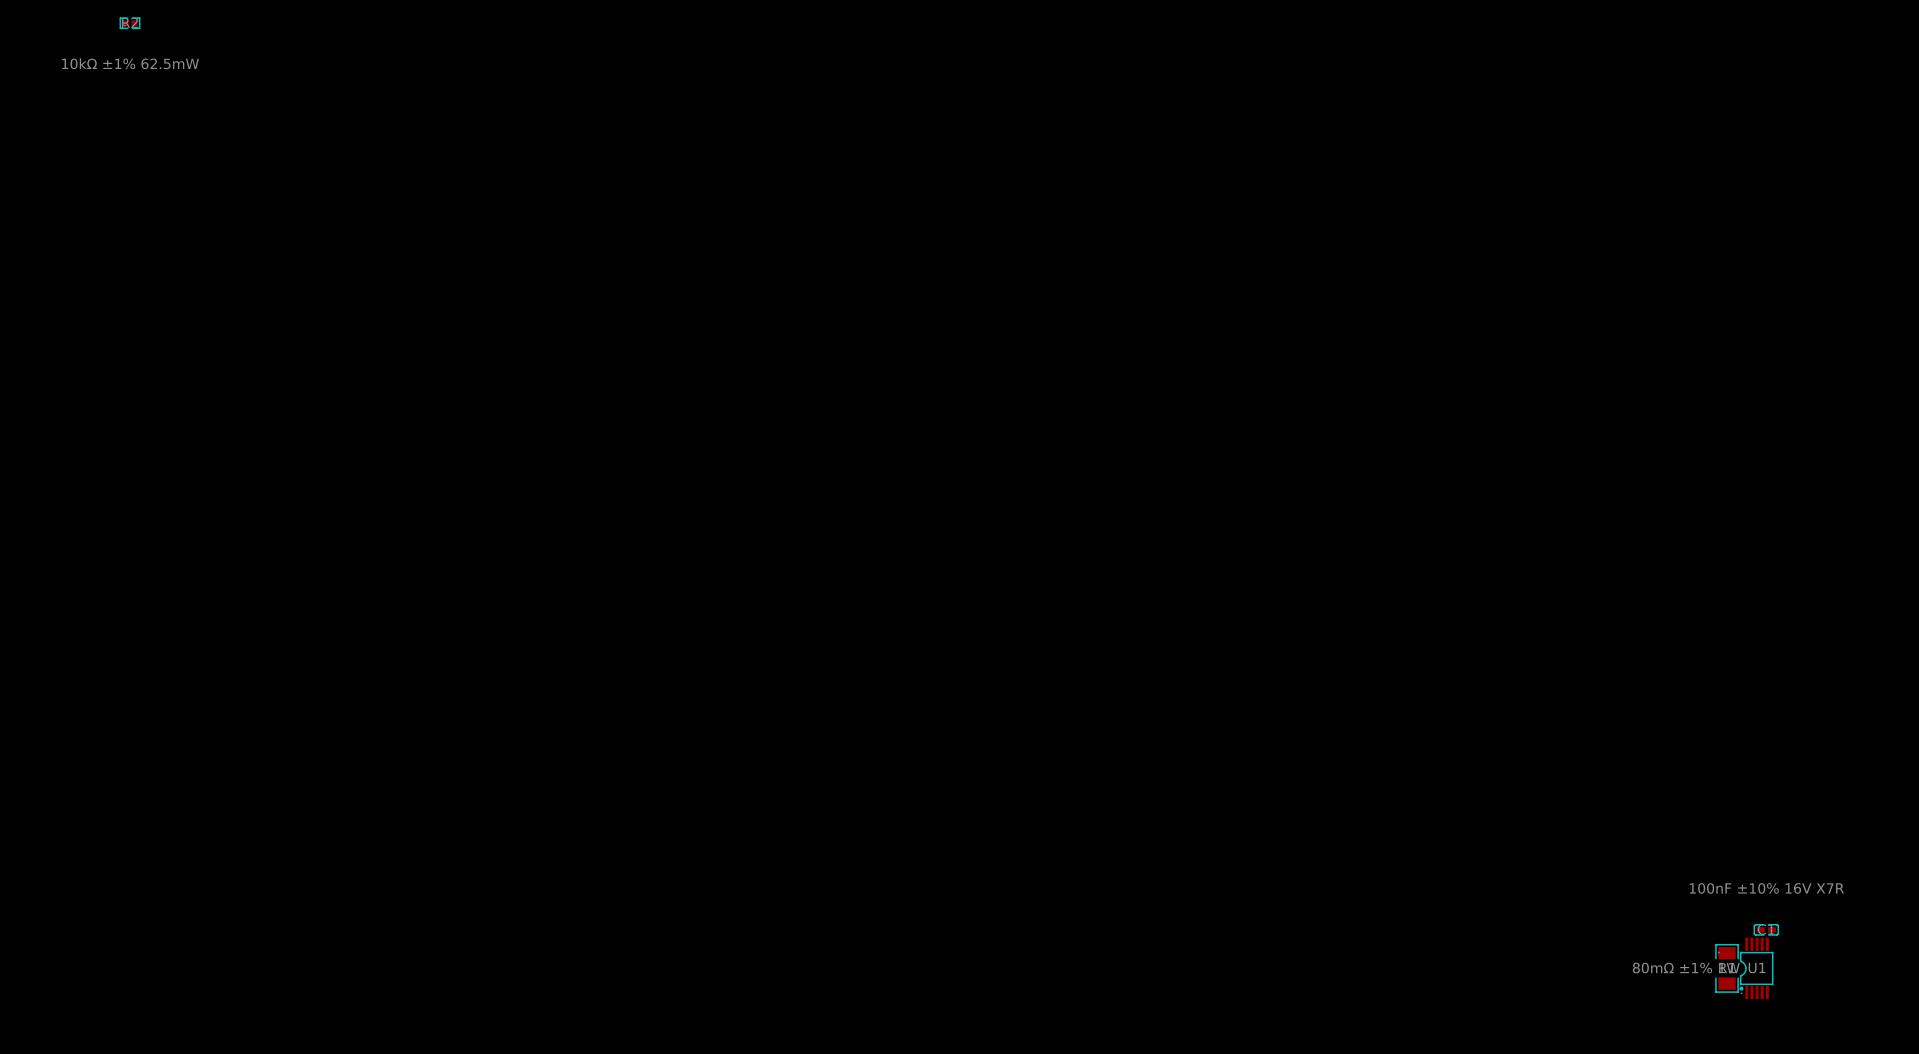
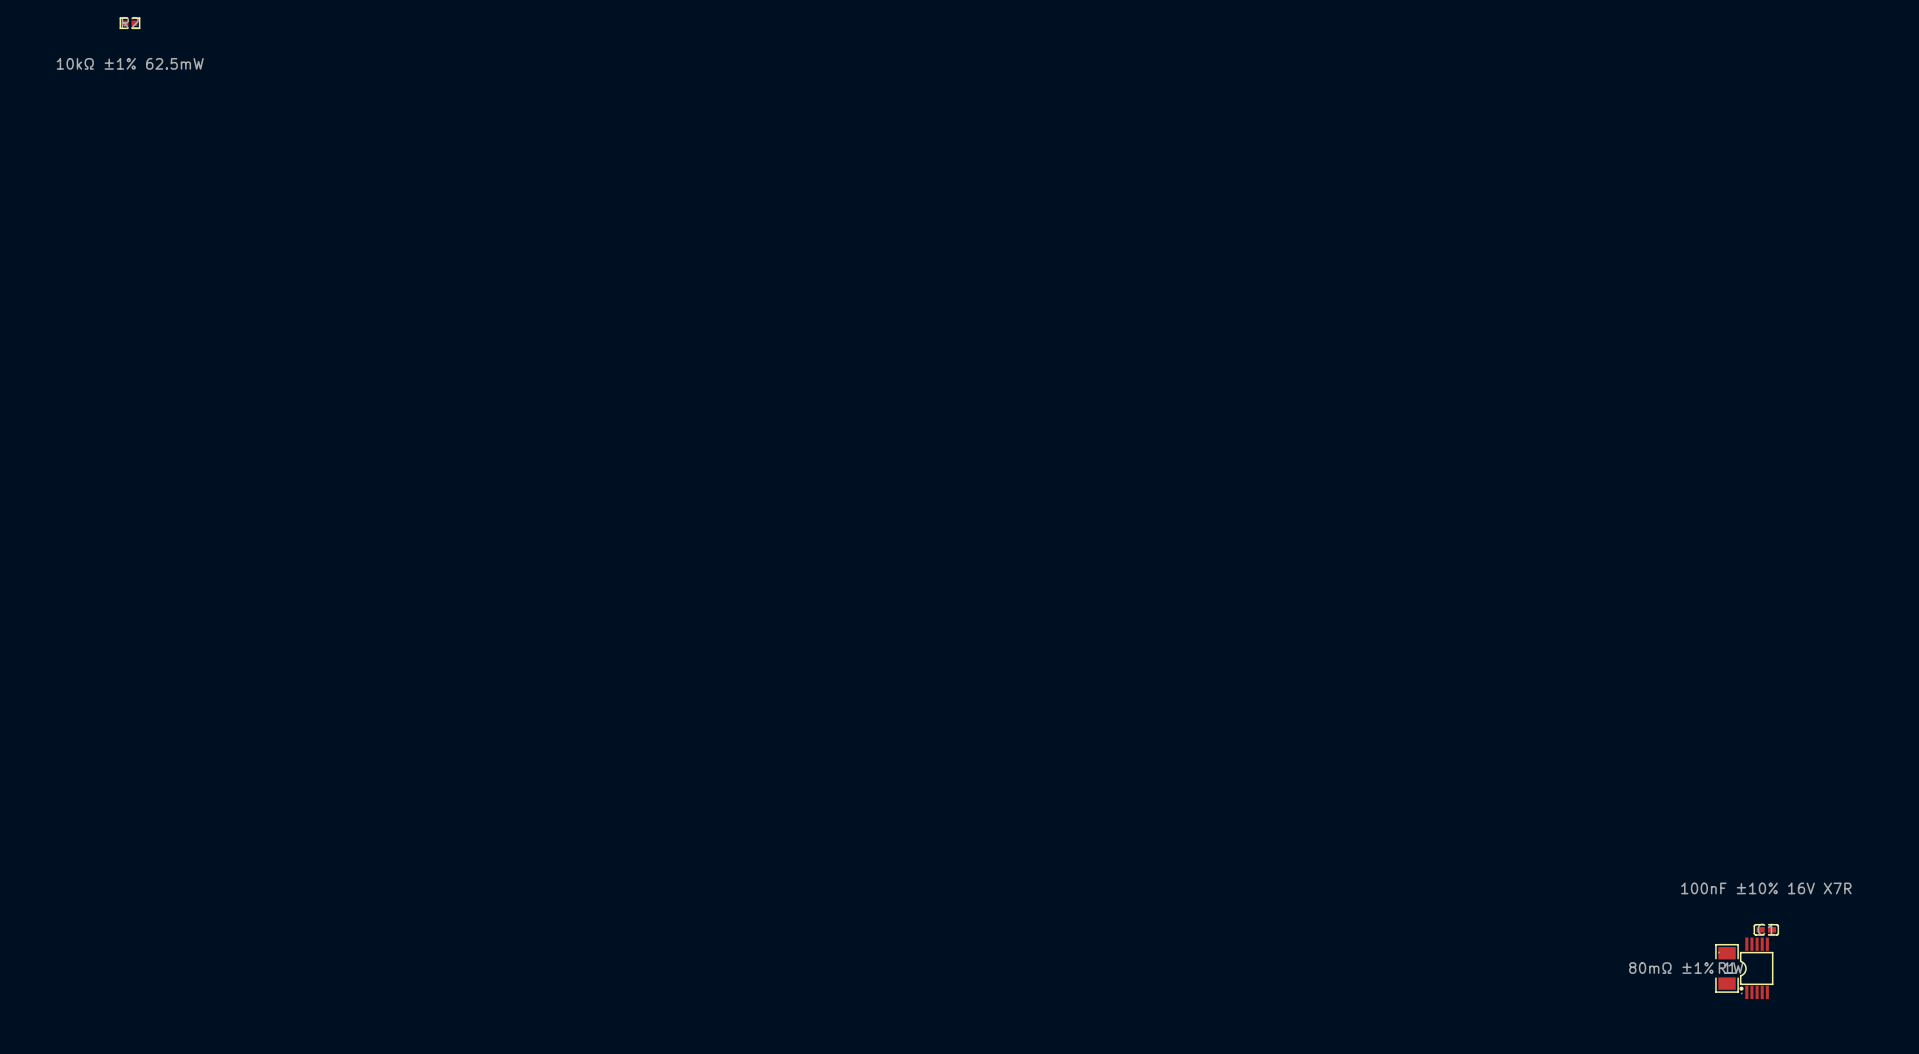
U1 name: U1 (1757, 968) -> none

